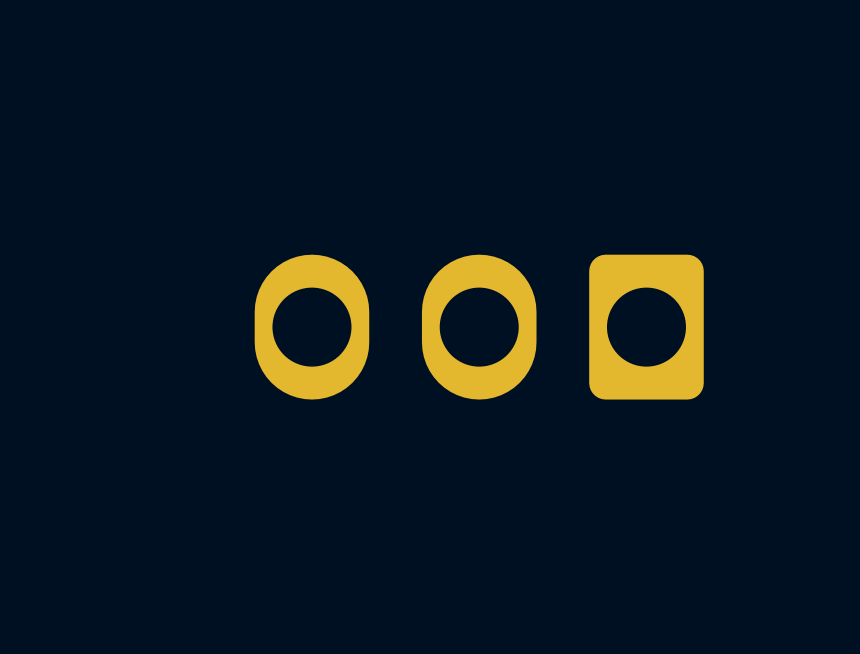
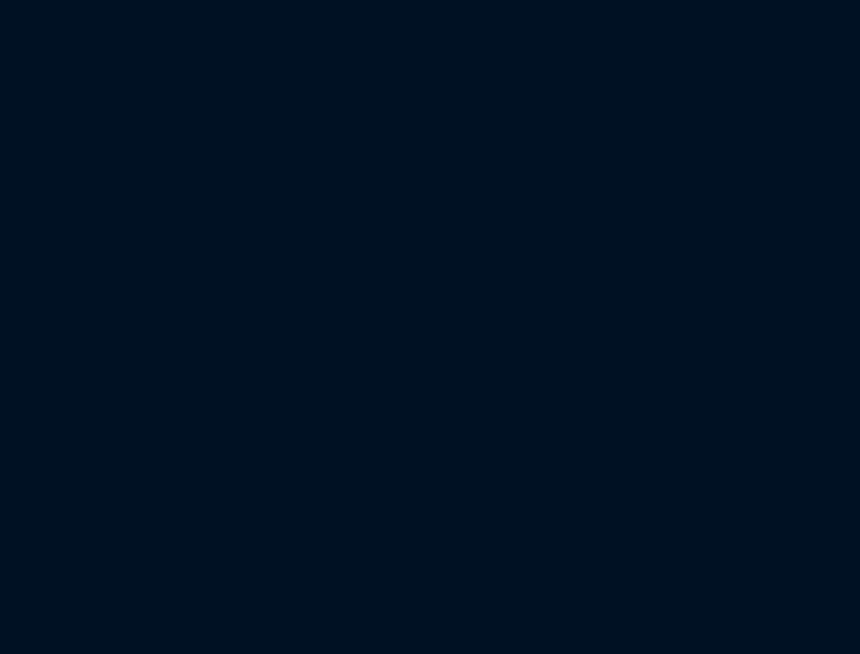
part: (479, 327) -> none

